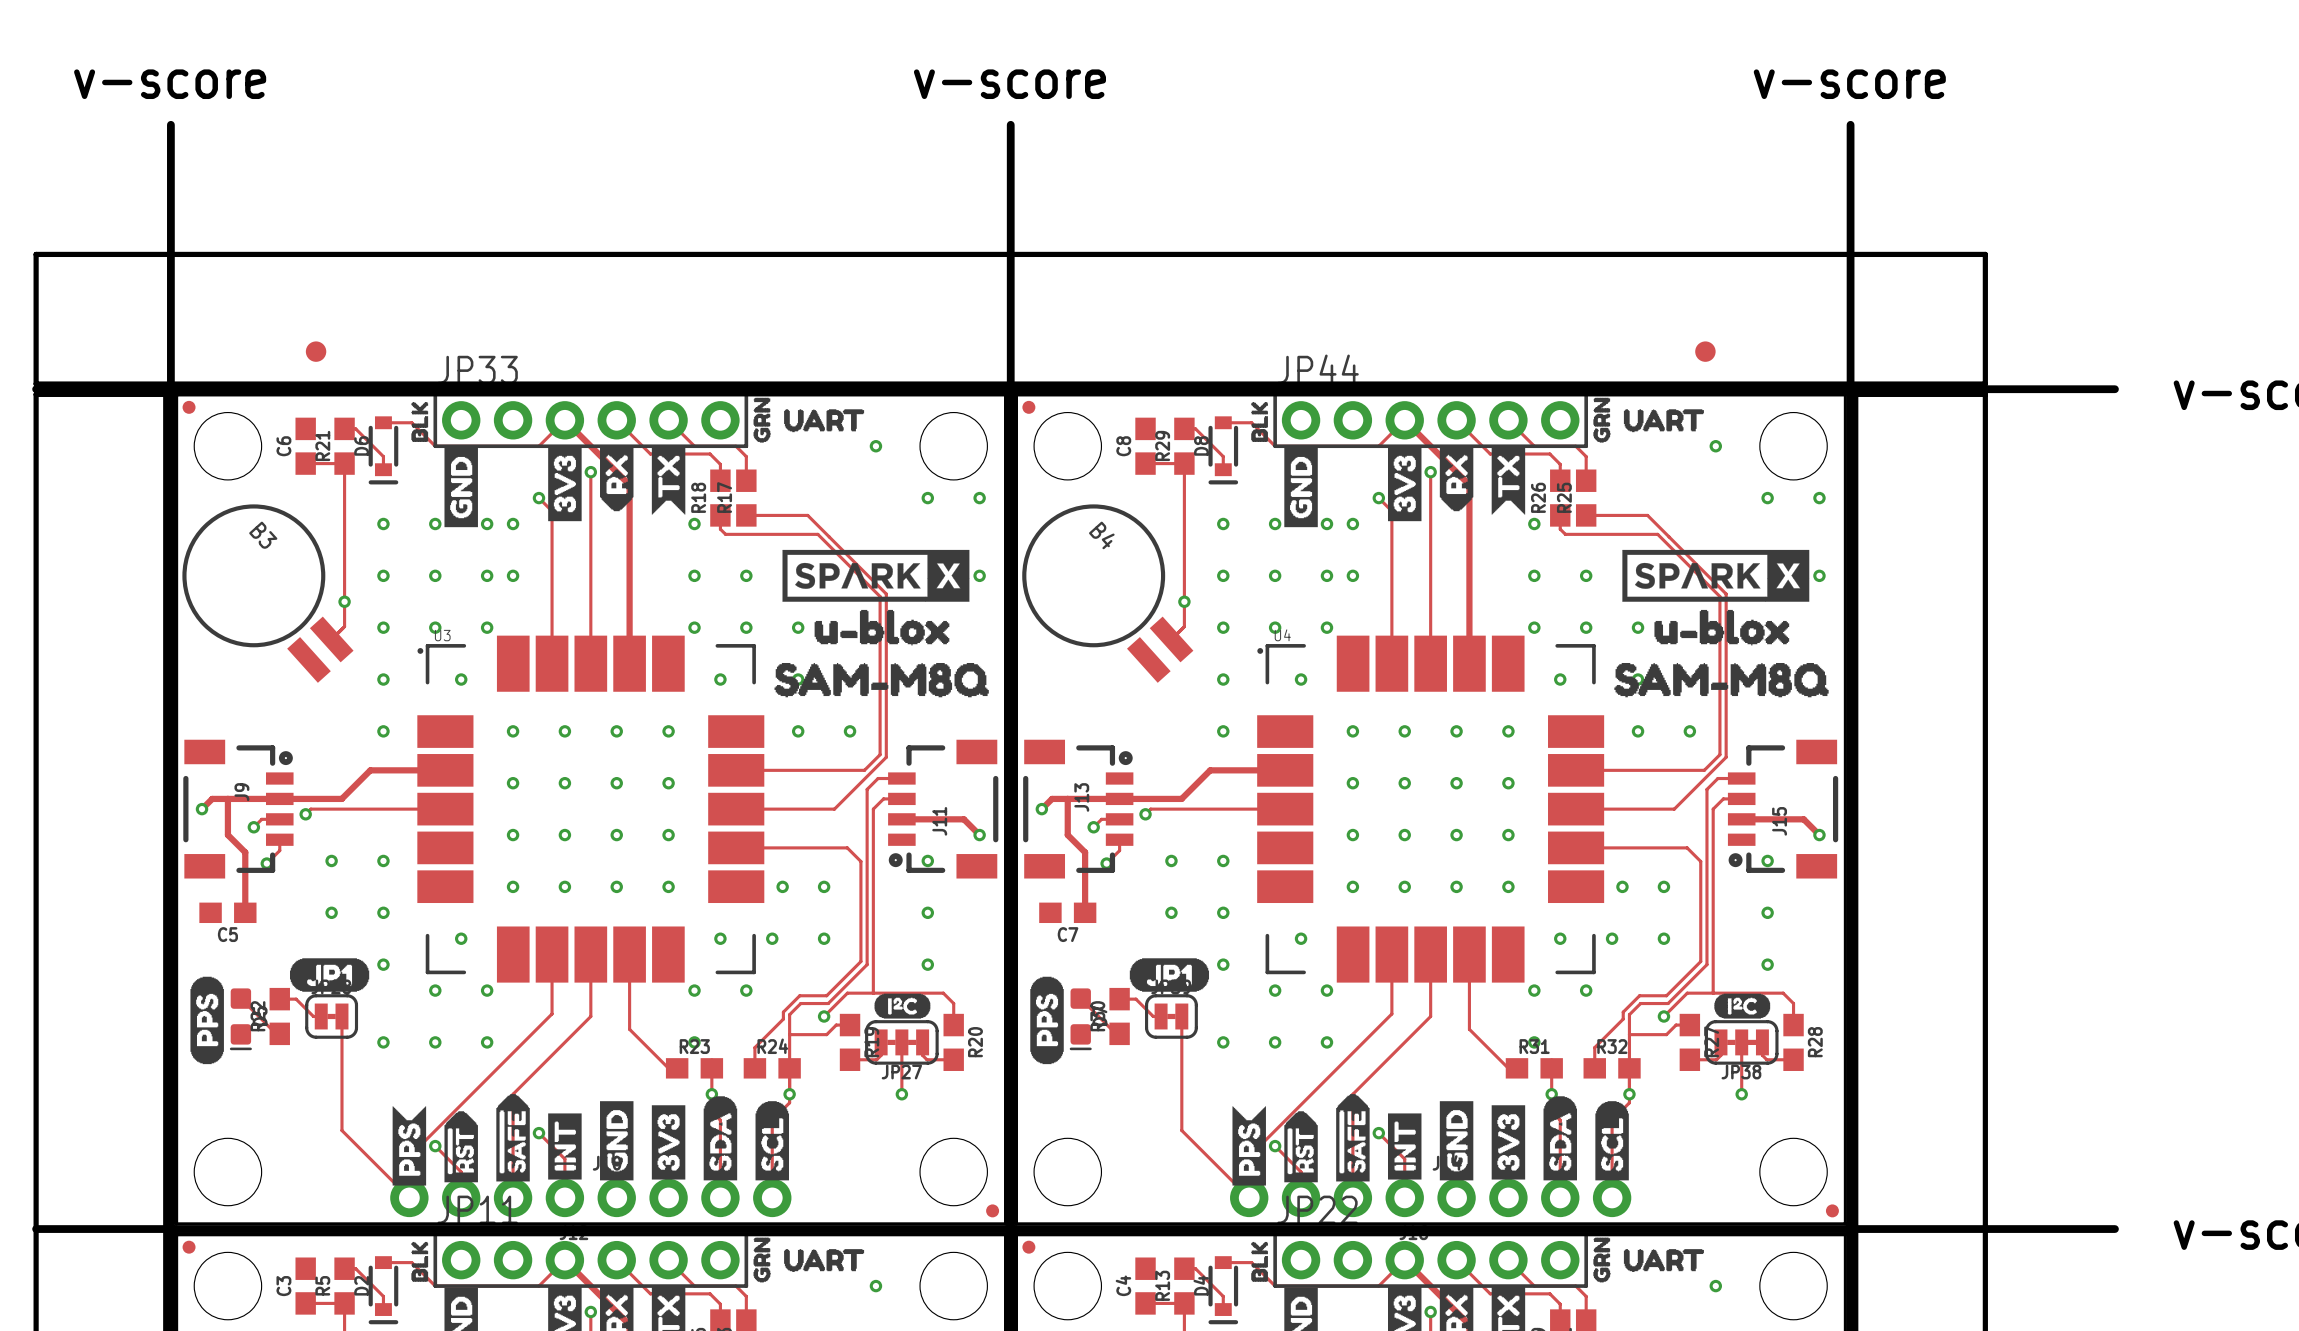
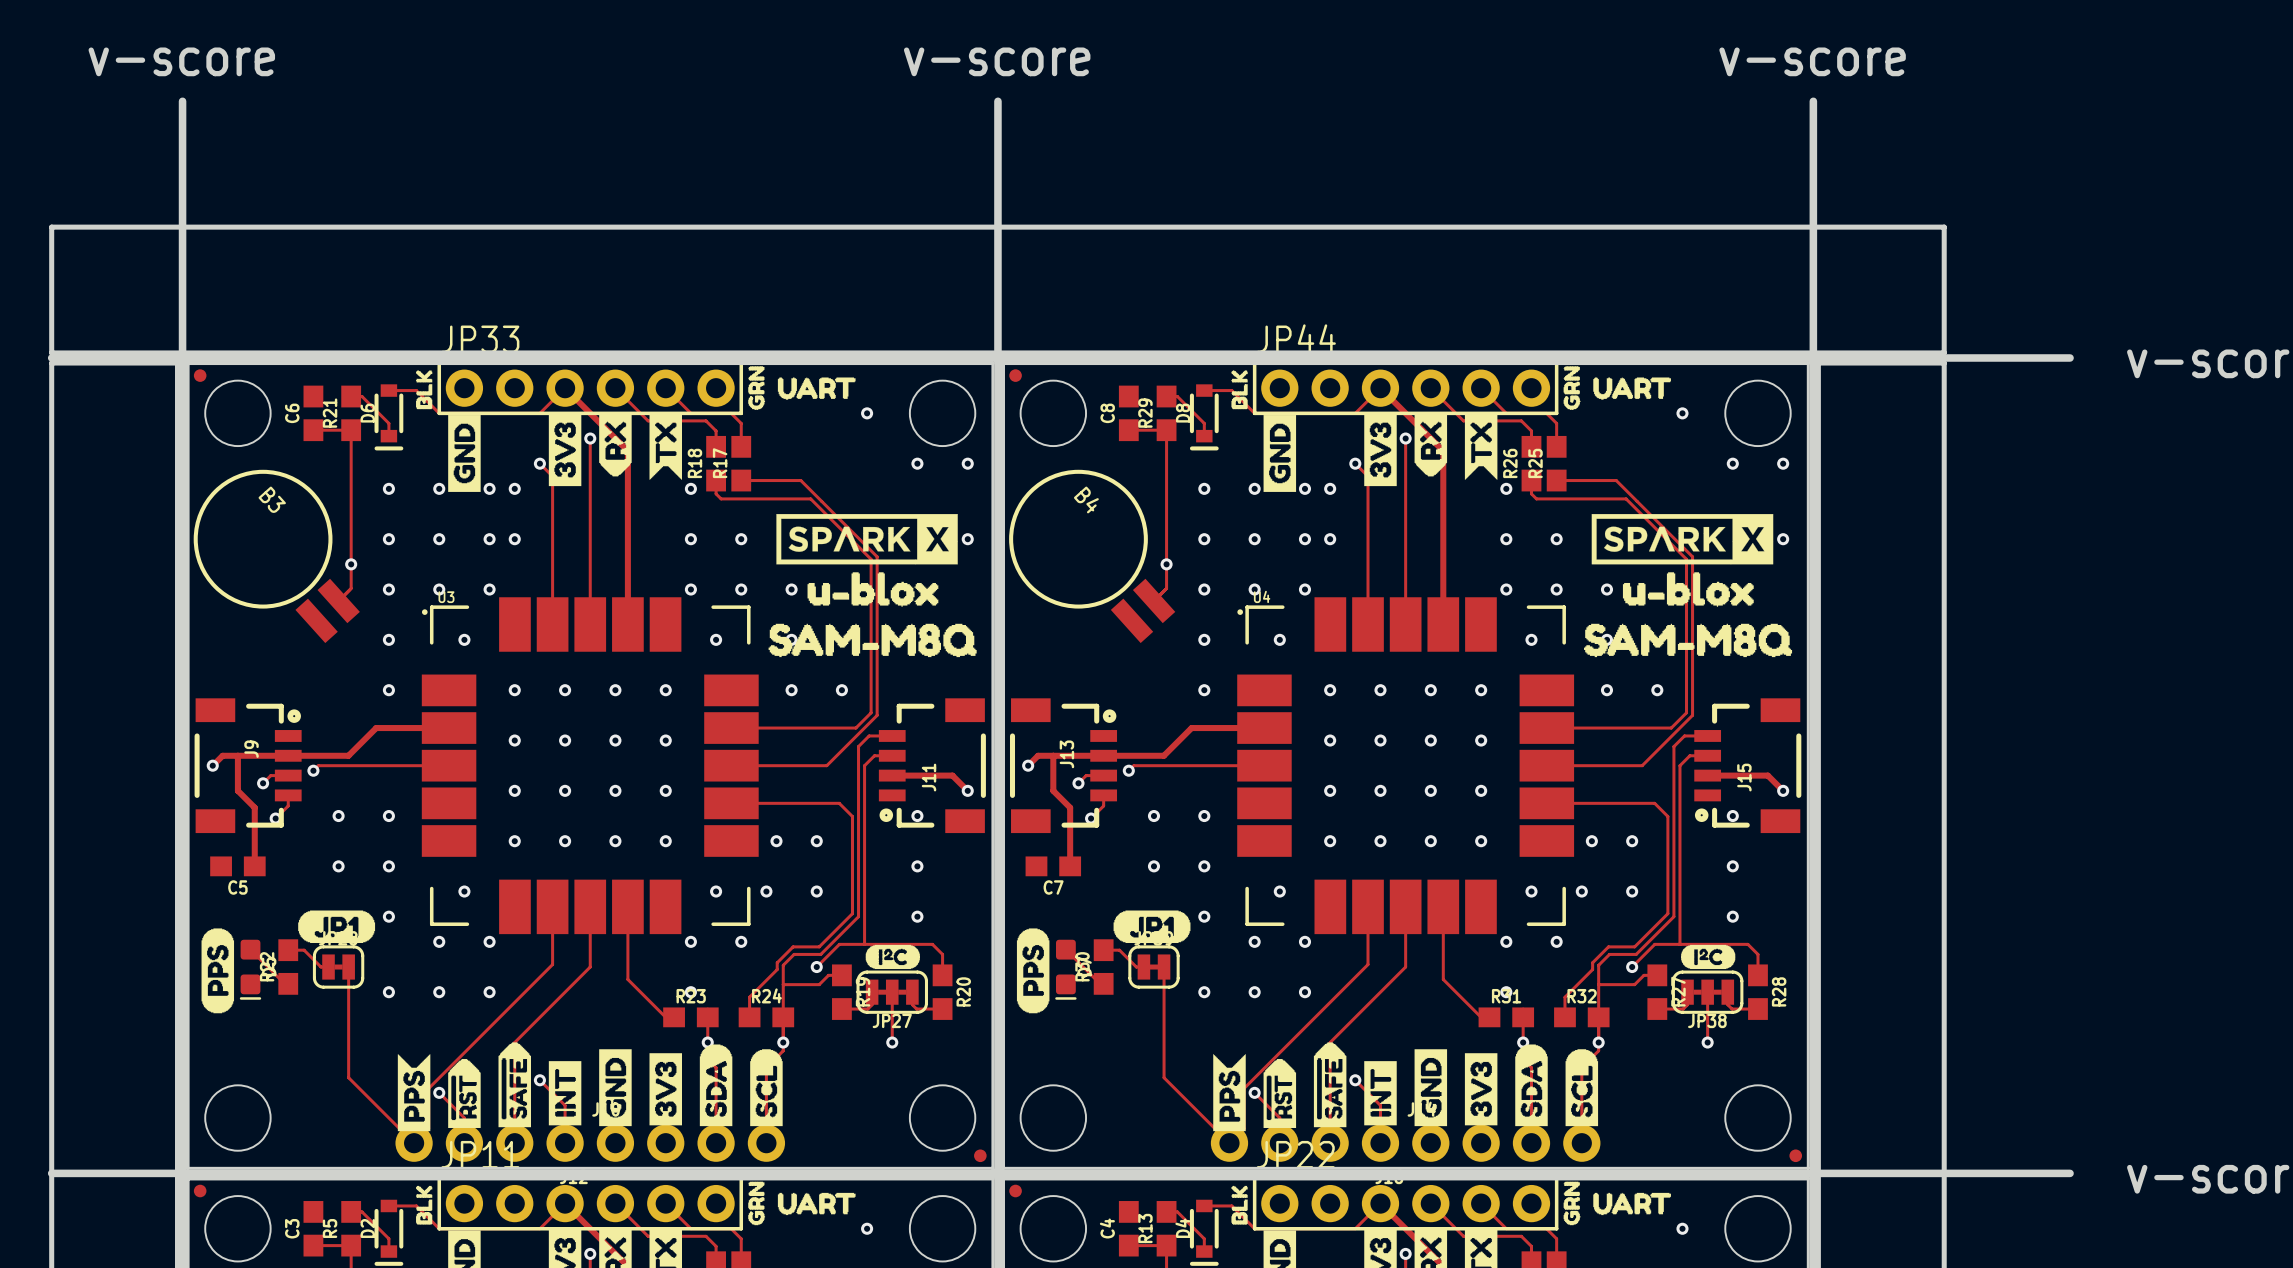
part: (316, 351) -> none
part: (1705, 351) -> none

